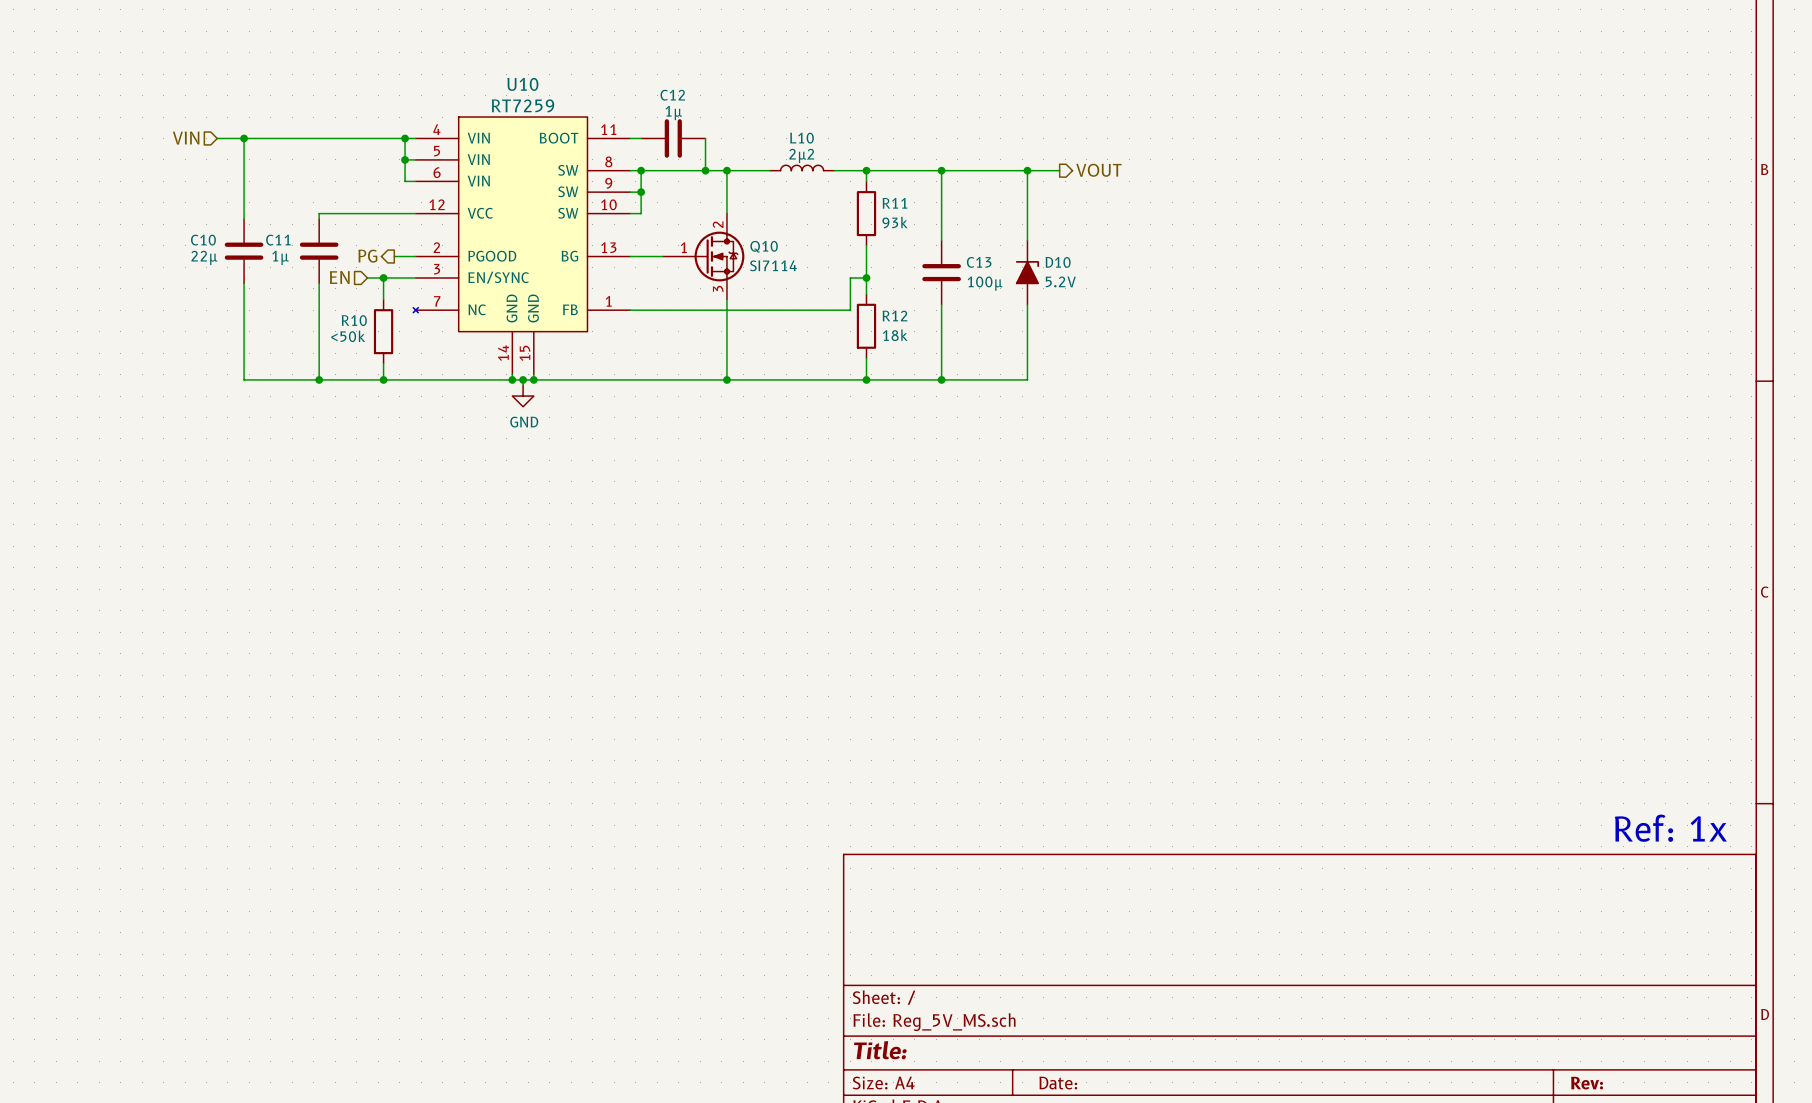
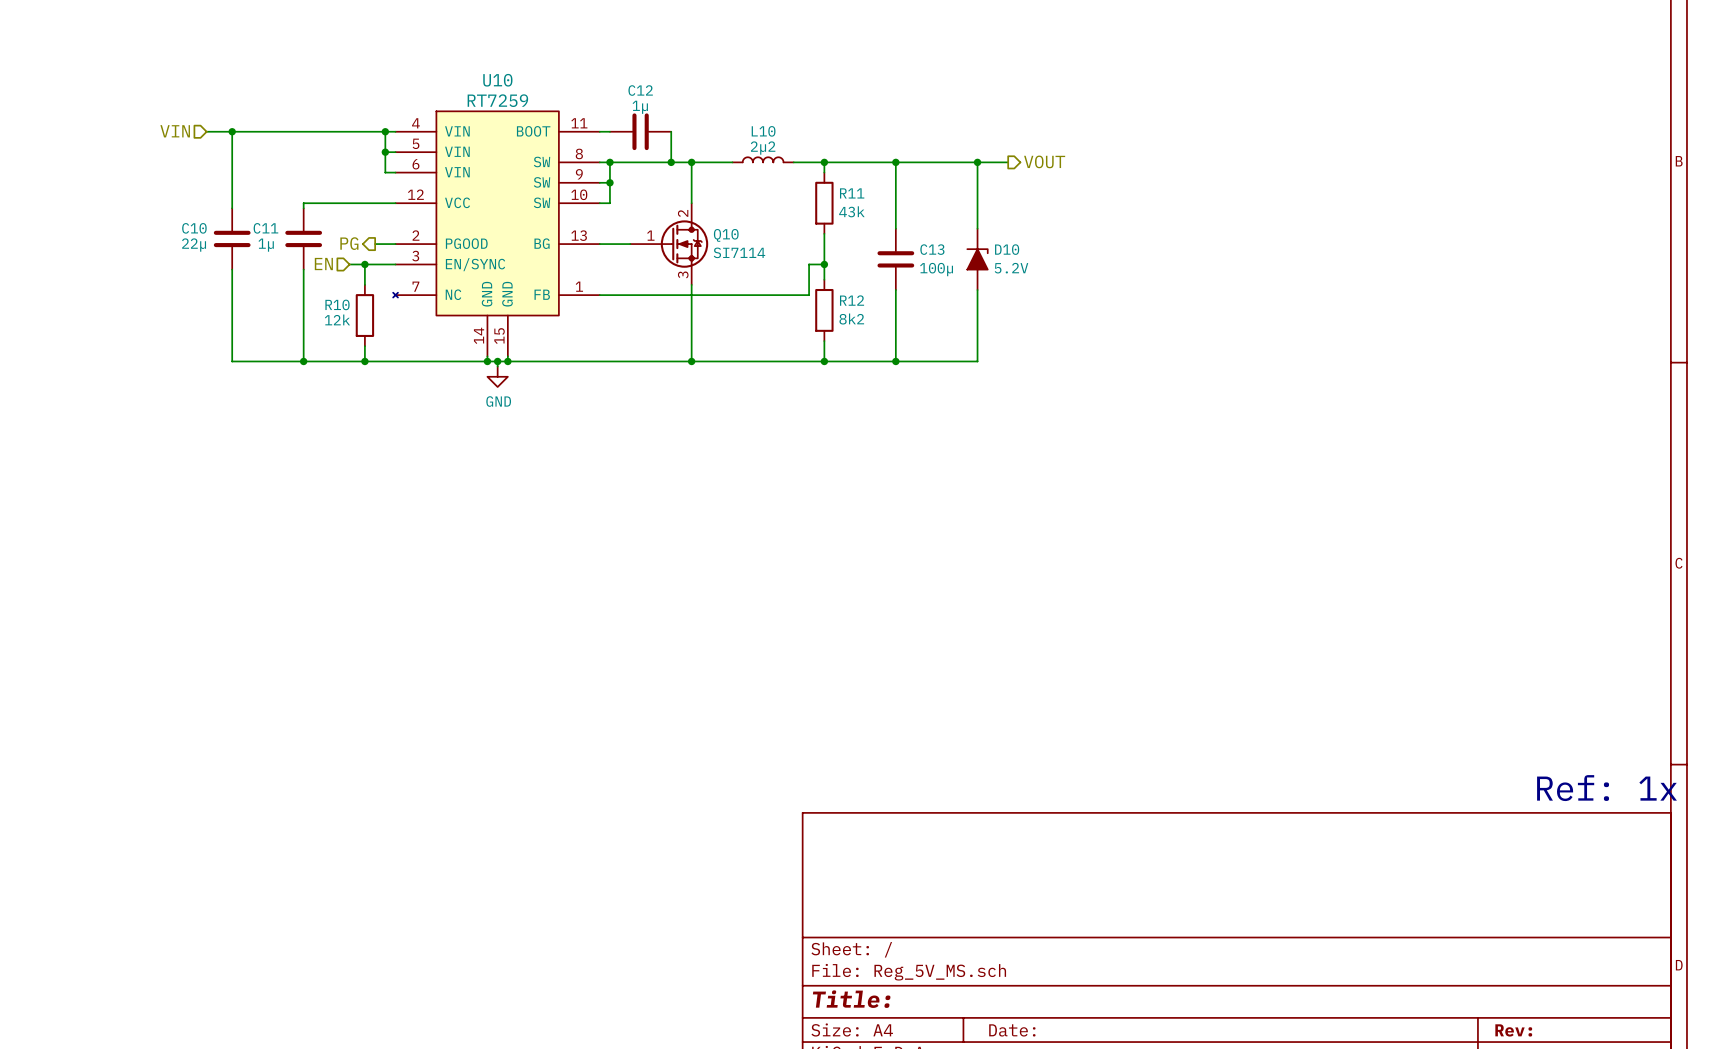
R11 value: 93k (895, 222) -> 43k (851, 211)
R12 value: 18k (895, 335) -> 8k2 (851, 319)
R10 value: <50k (348, 336) -> 12k (337, 319)

